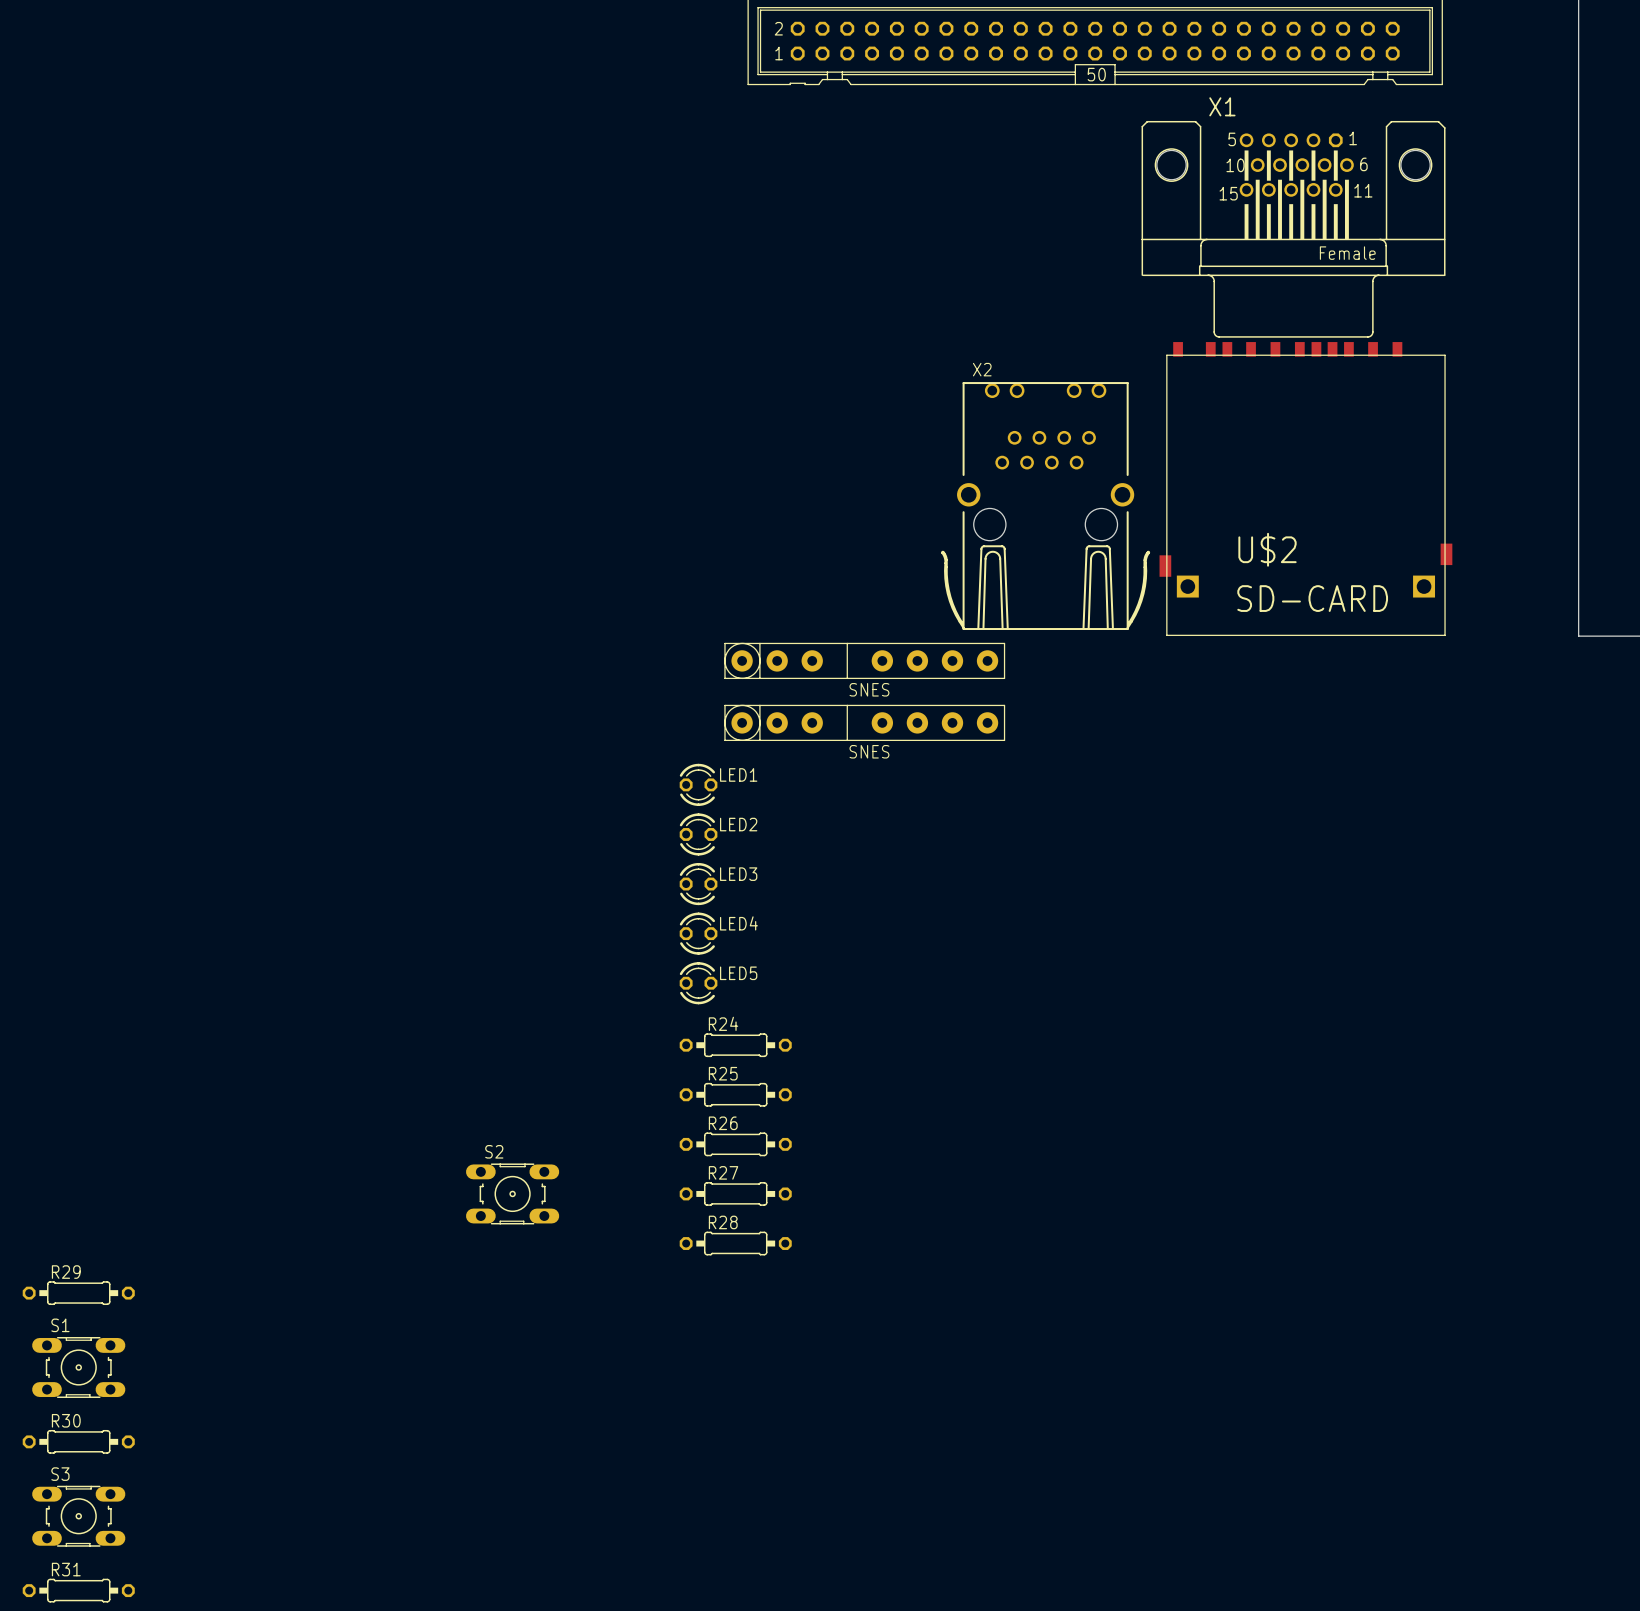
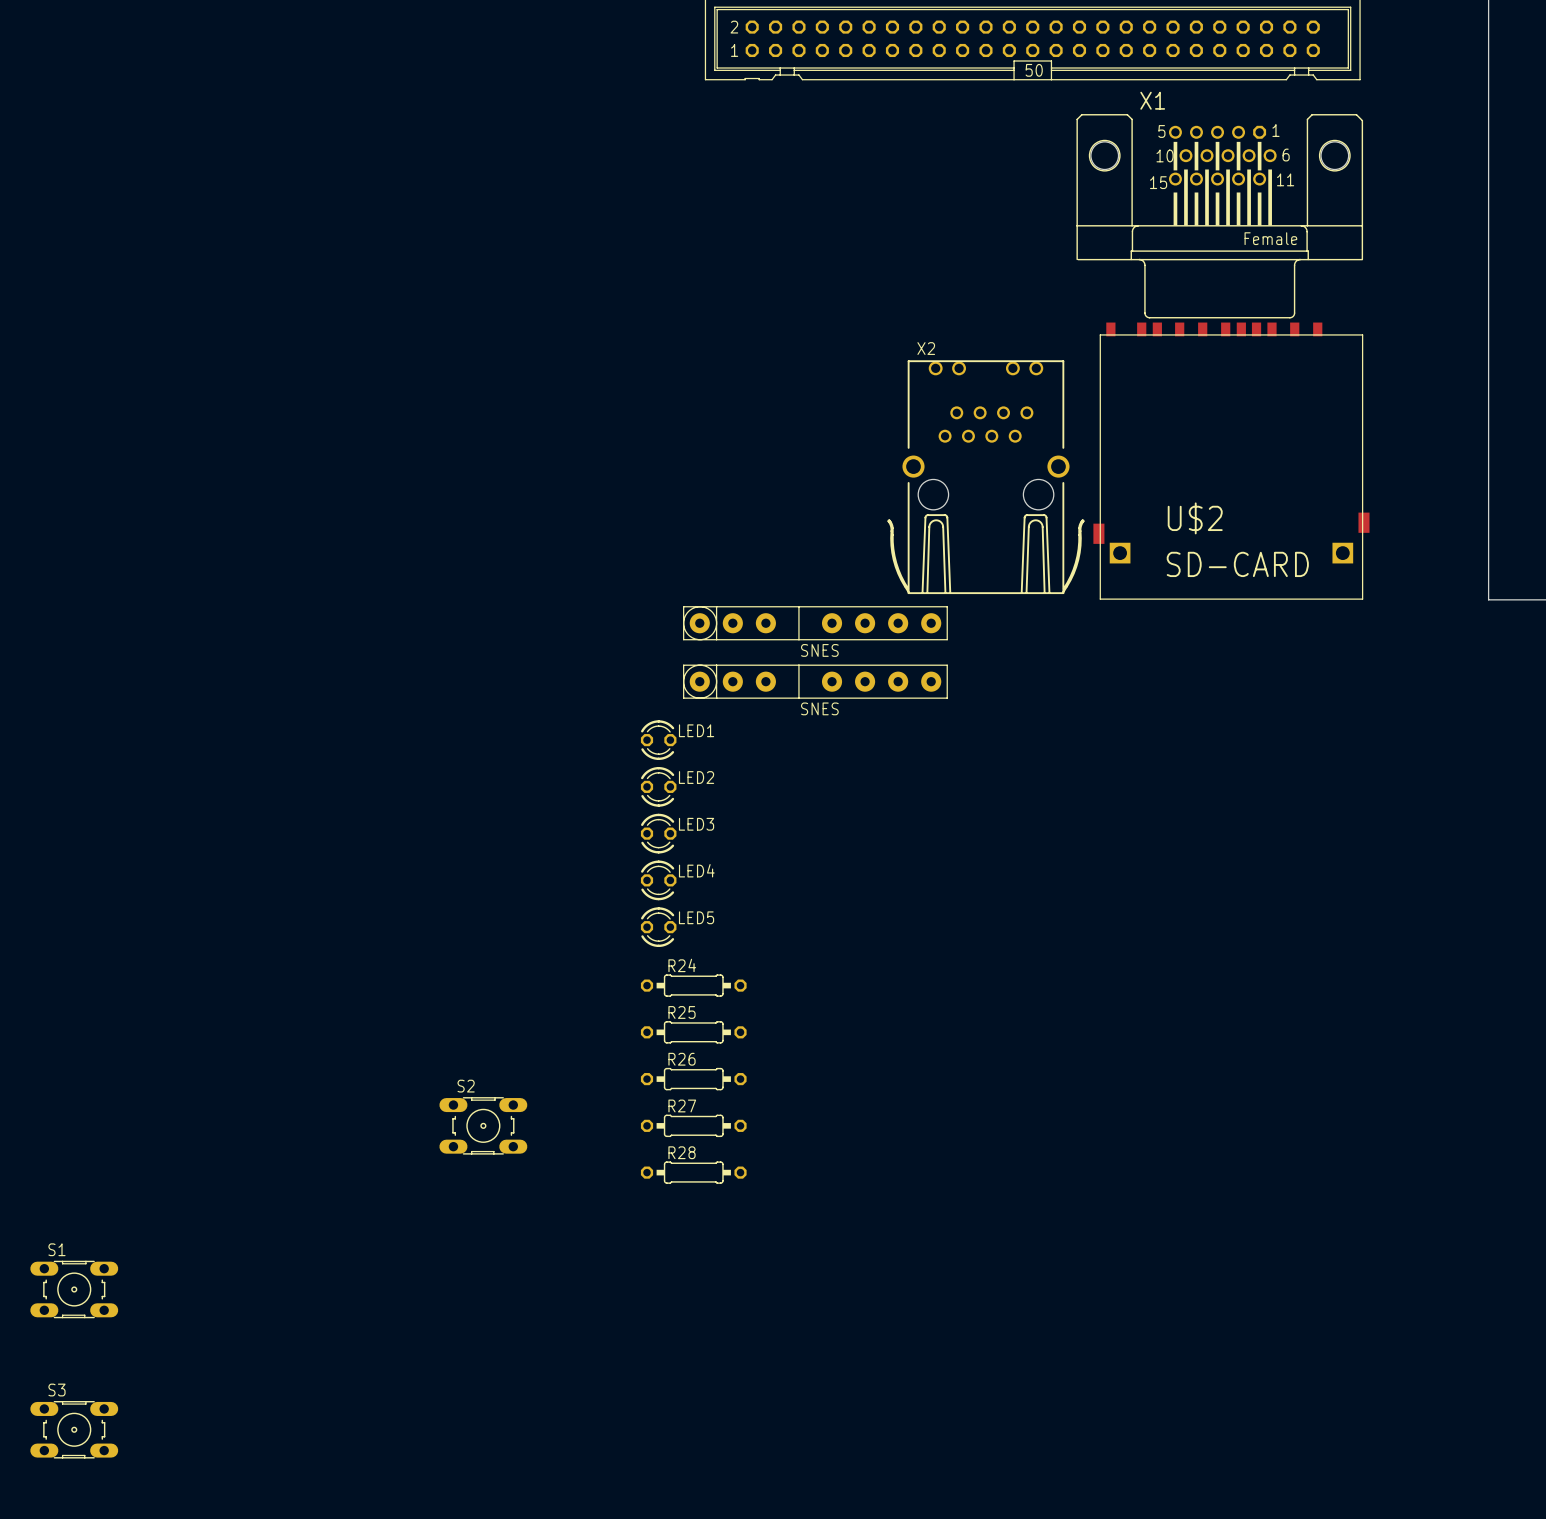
R29: (78, 1293) -> none
R30: (78, 1441) -> none
R31: (78, 1590) -> none

